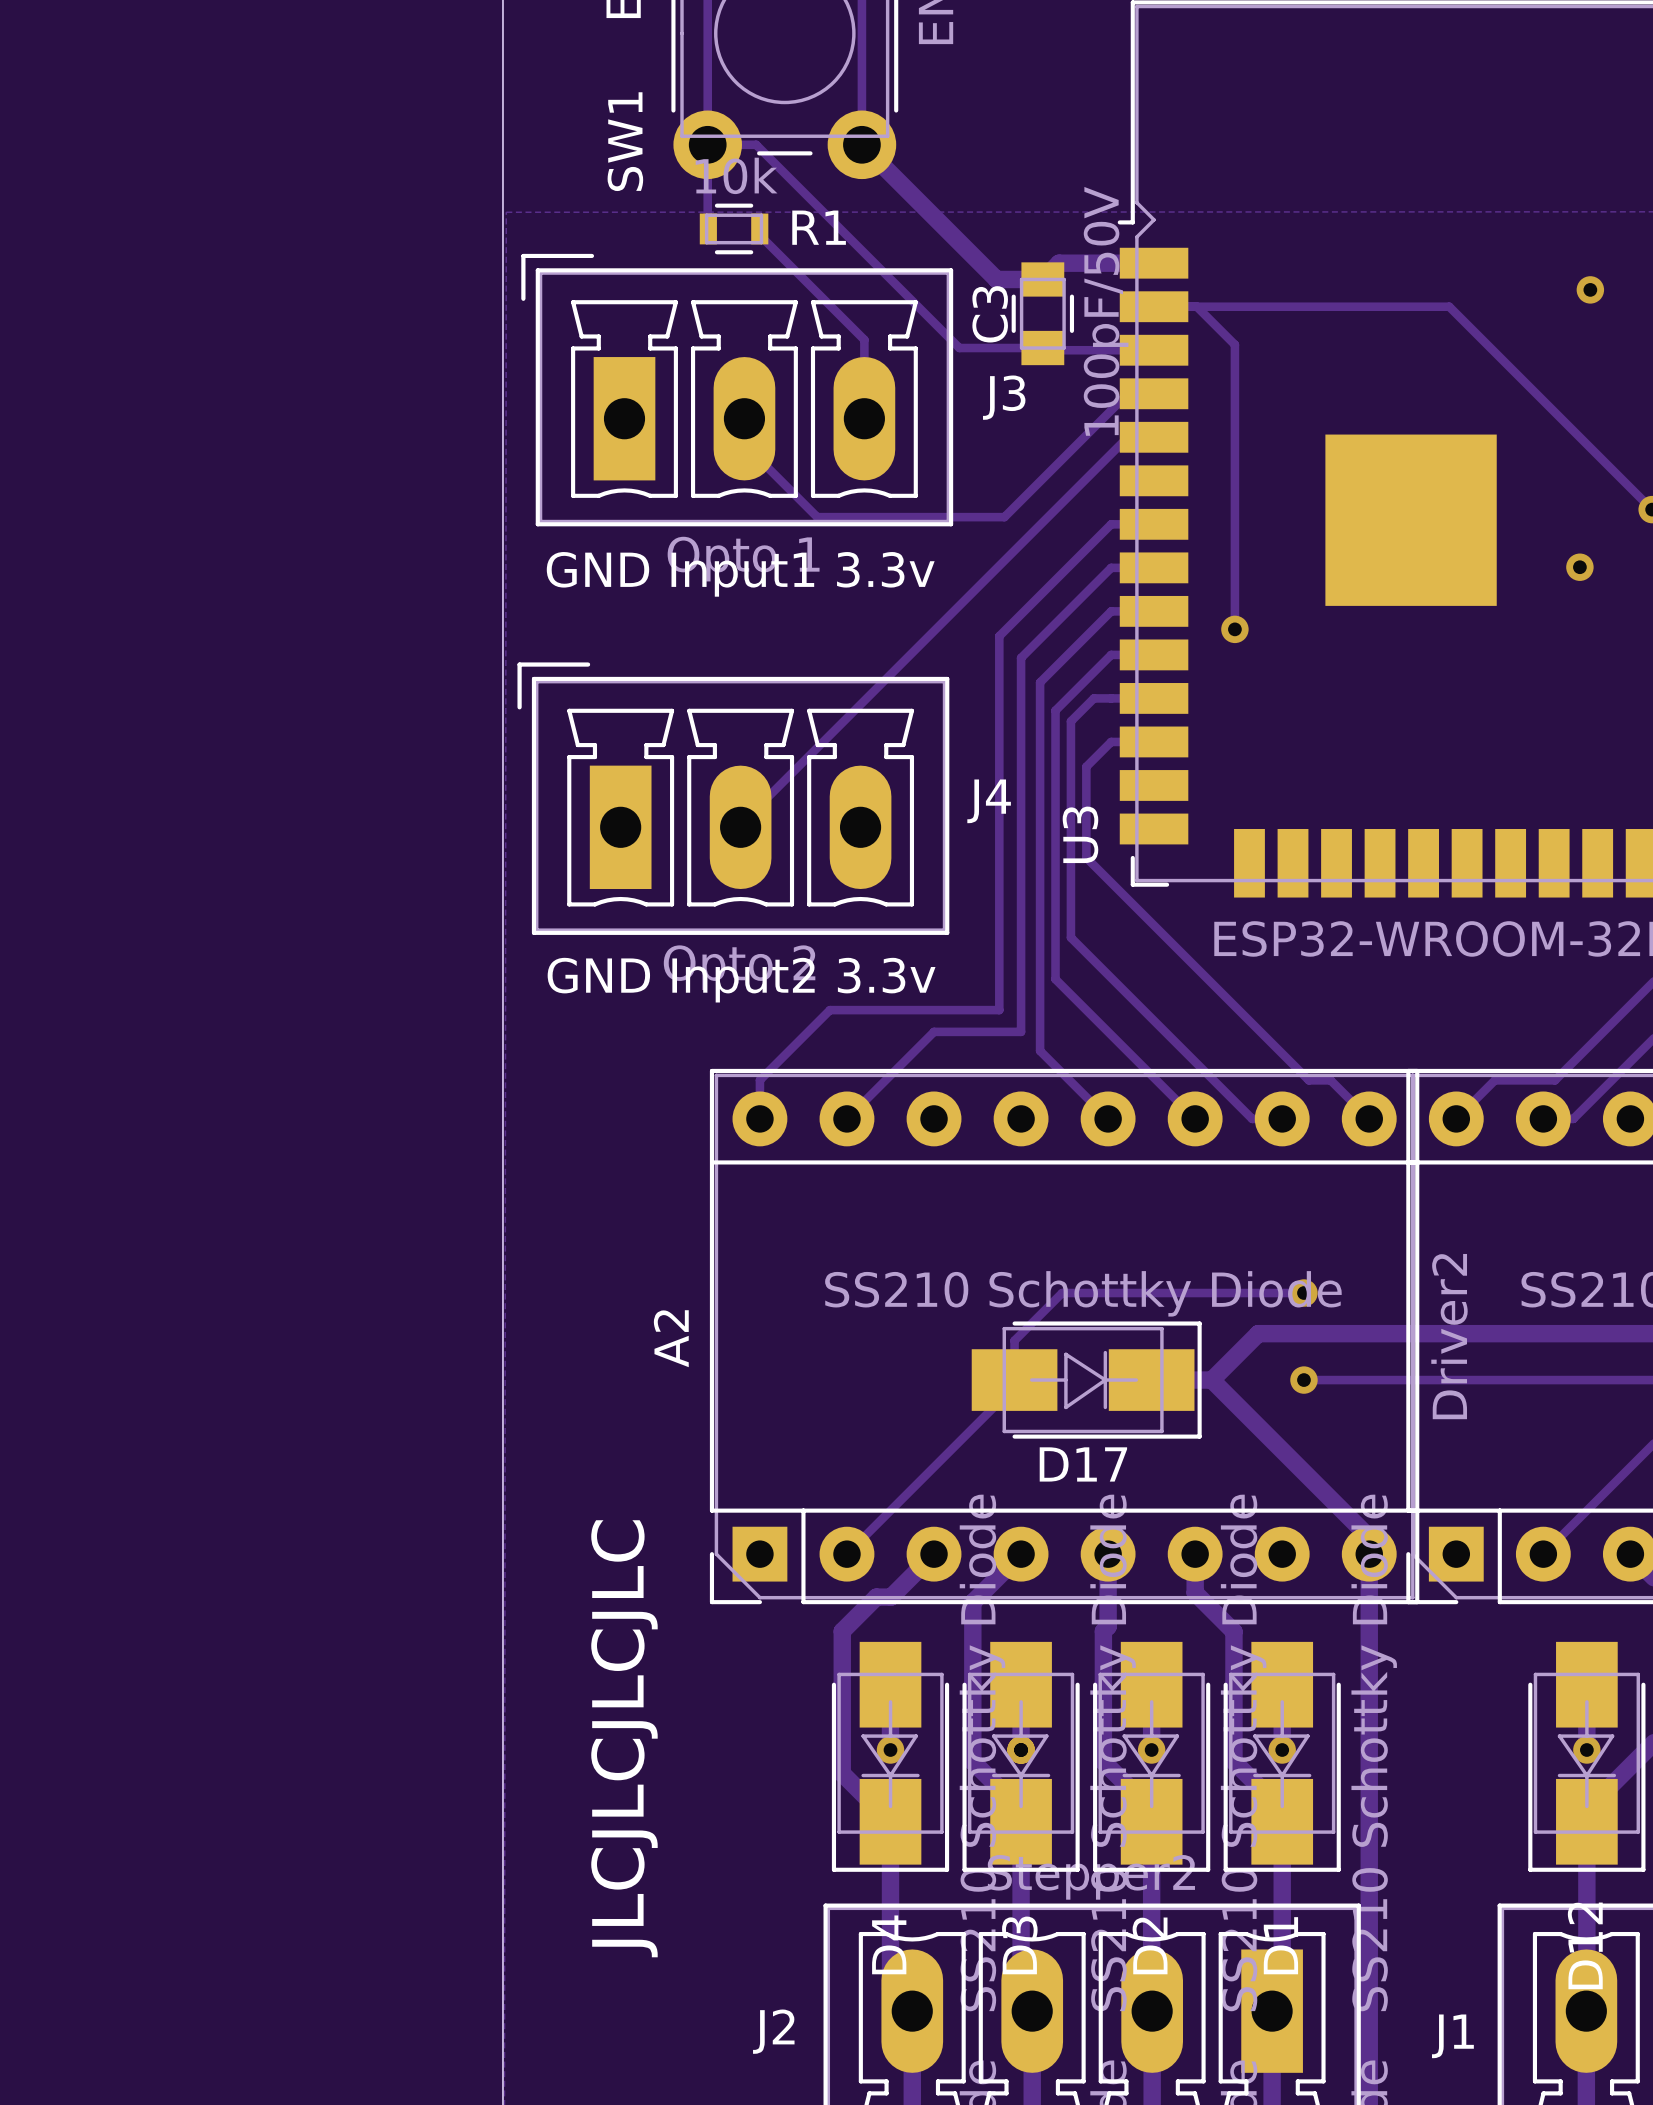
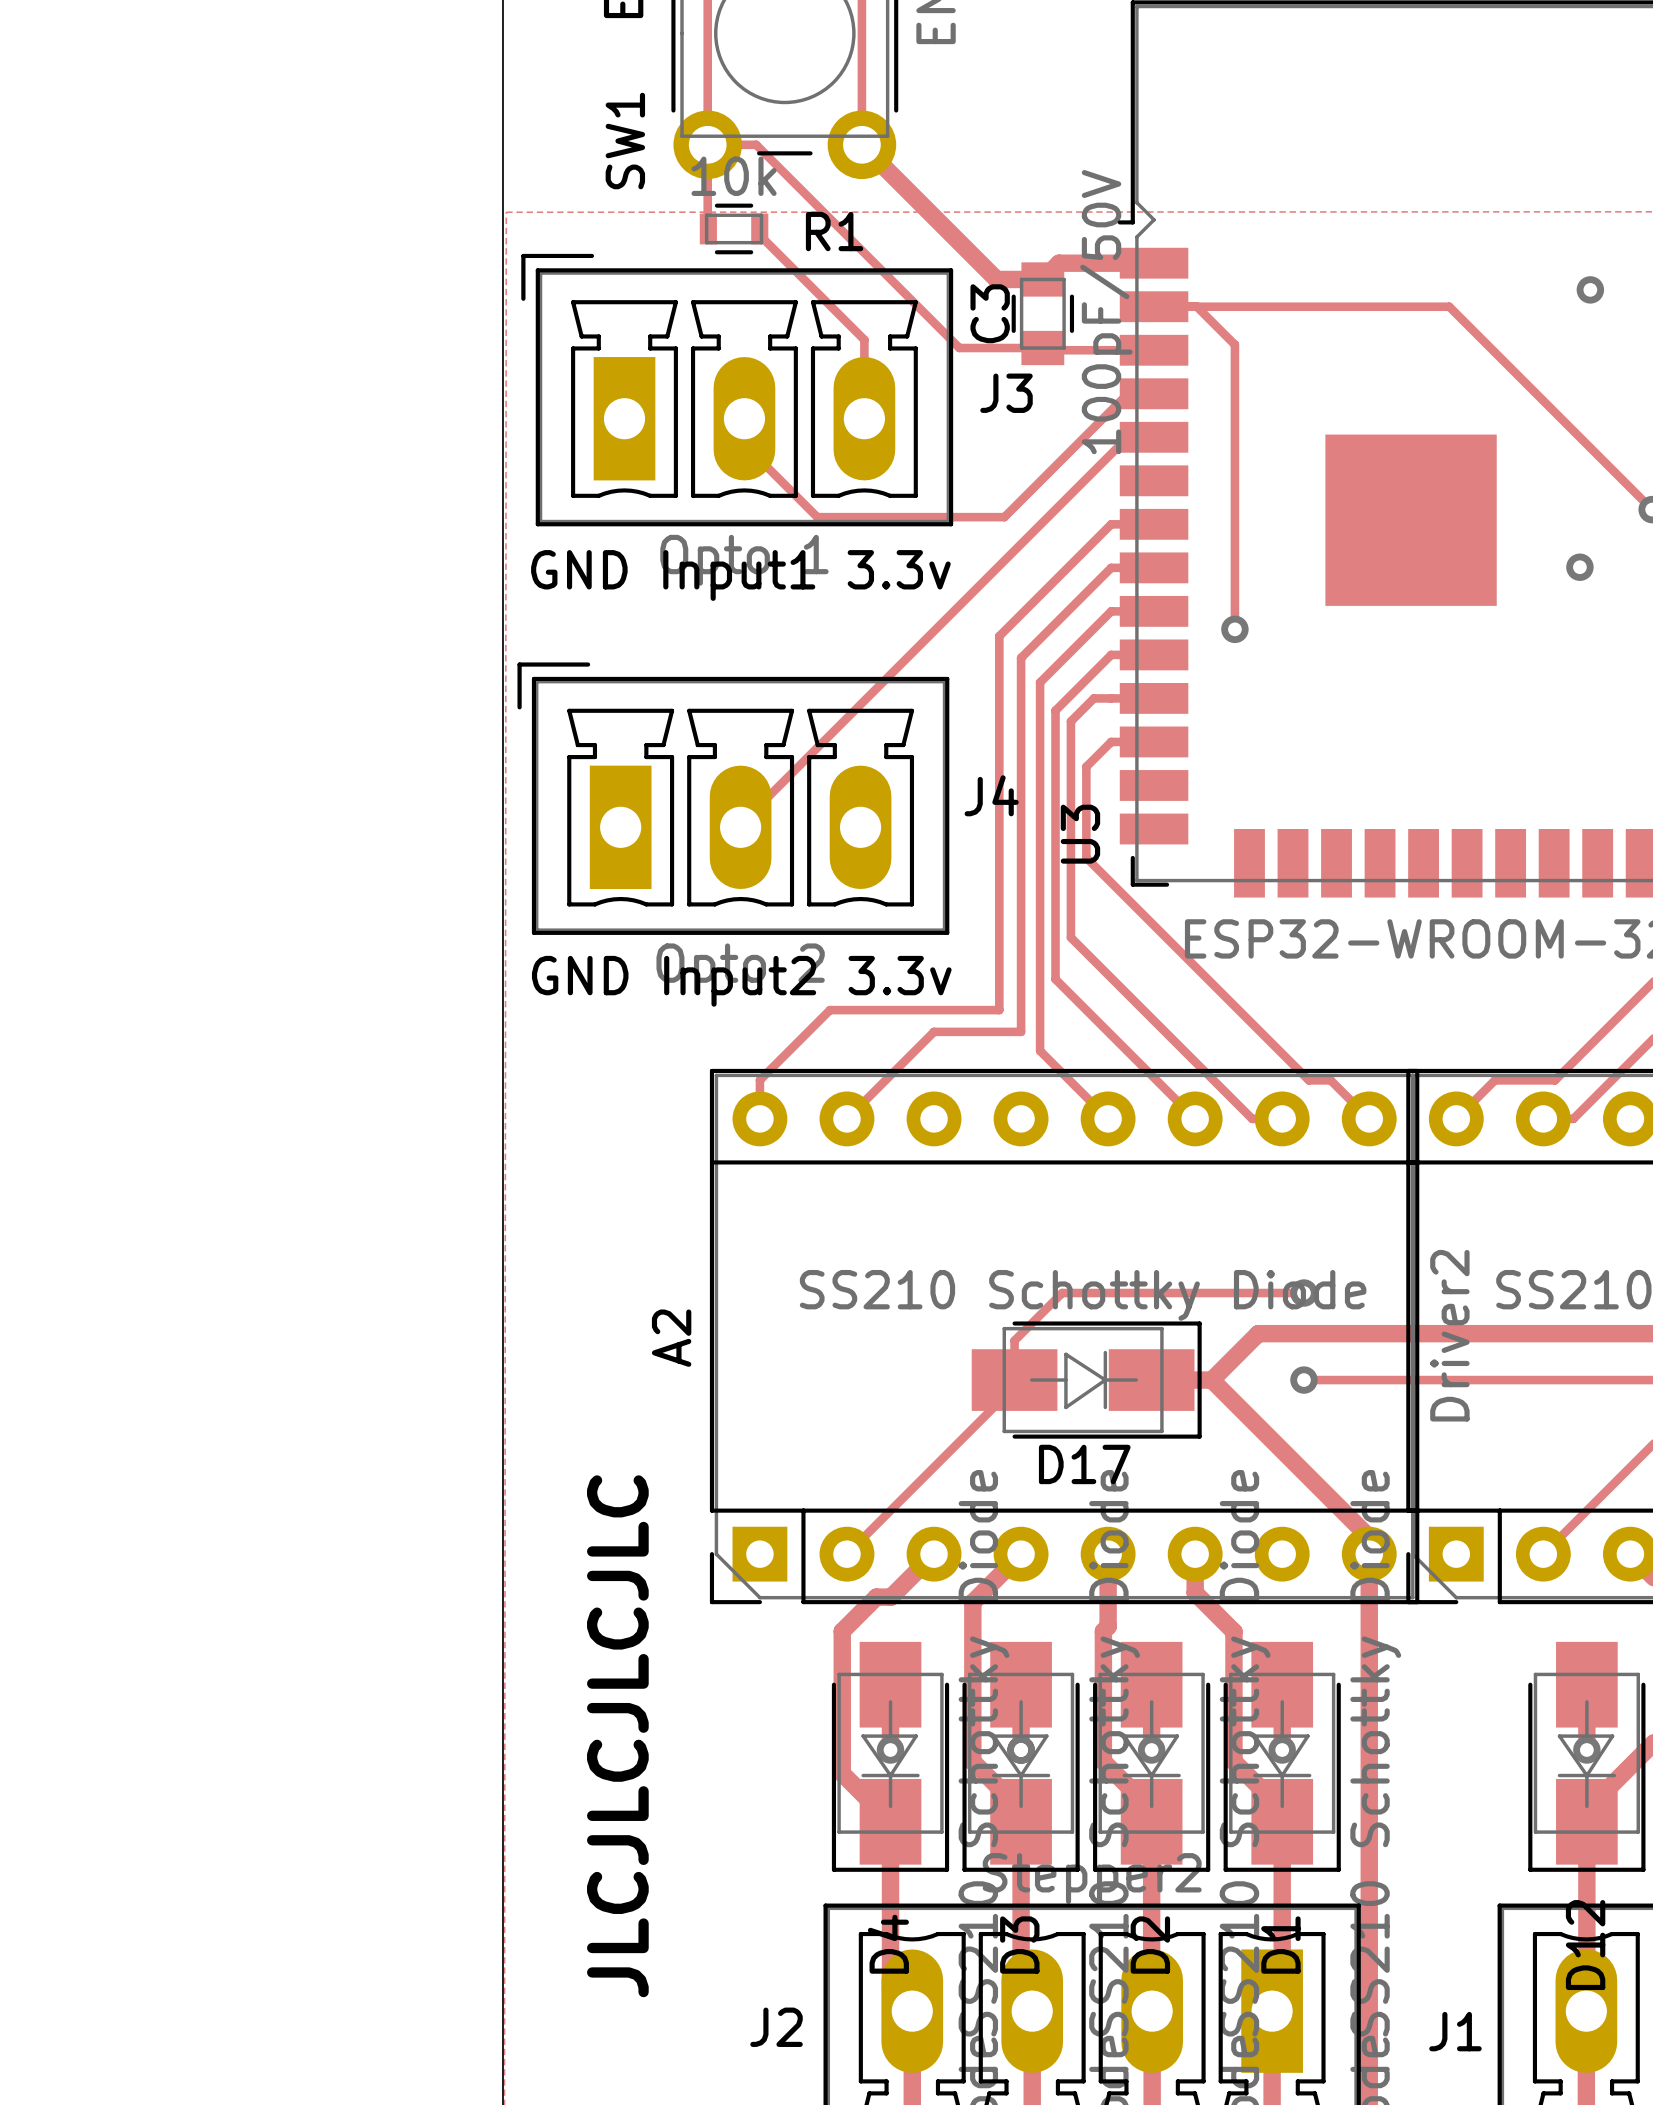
R1 name position: R1 (819, 227) -> R1 (834, 231)

